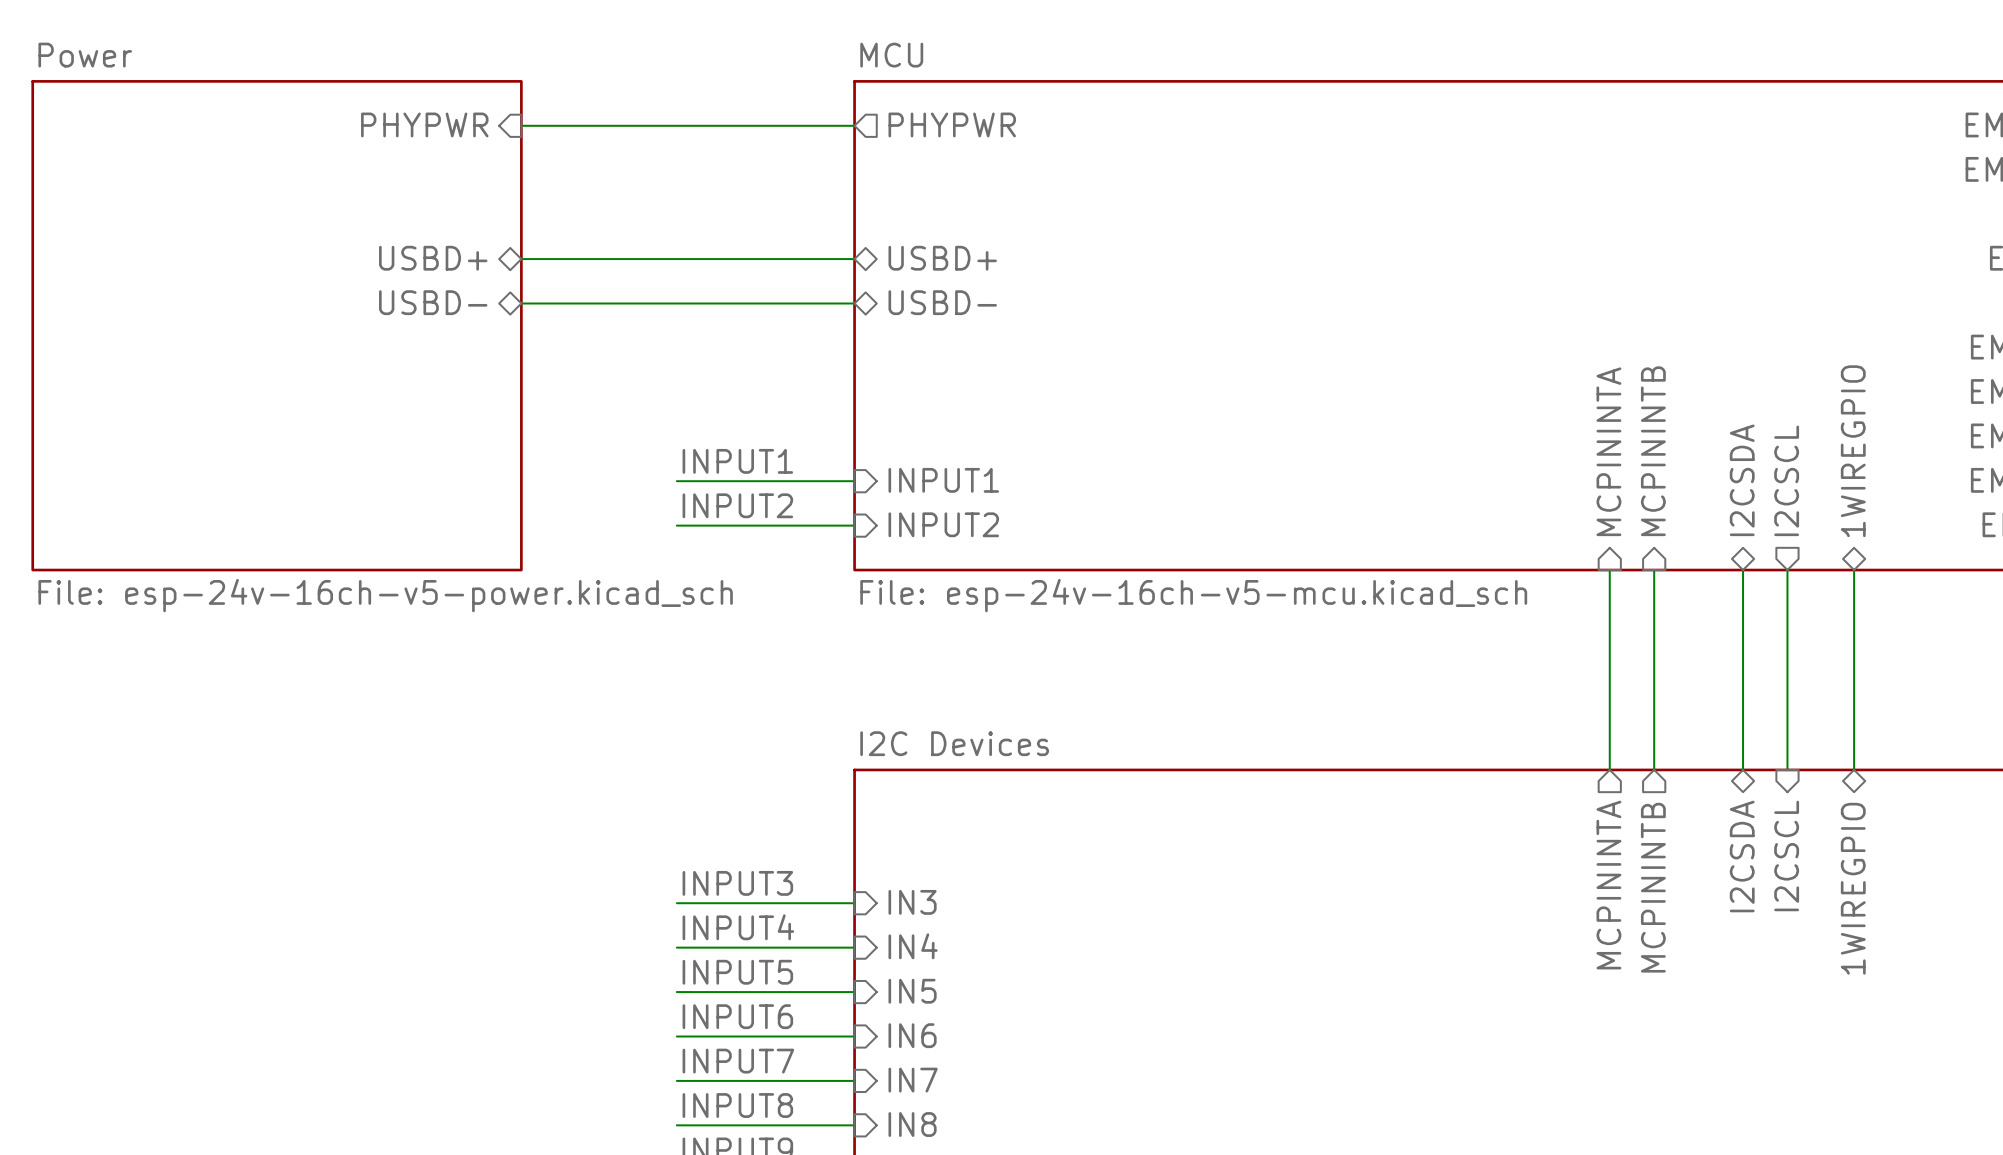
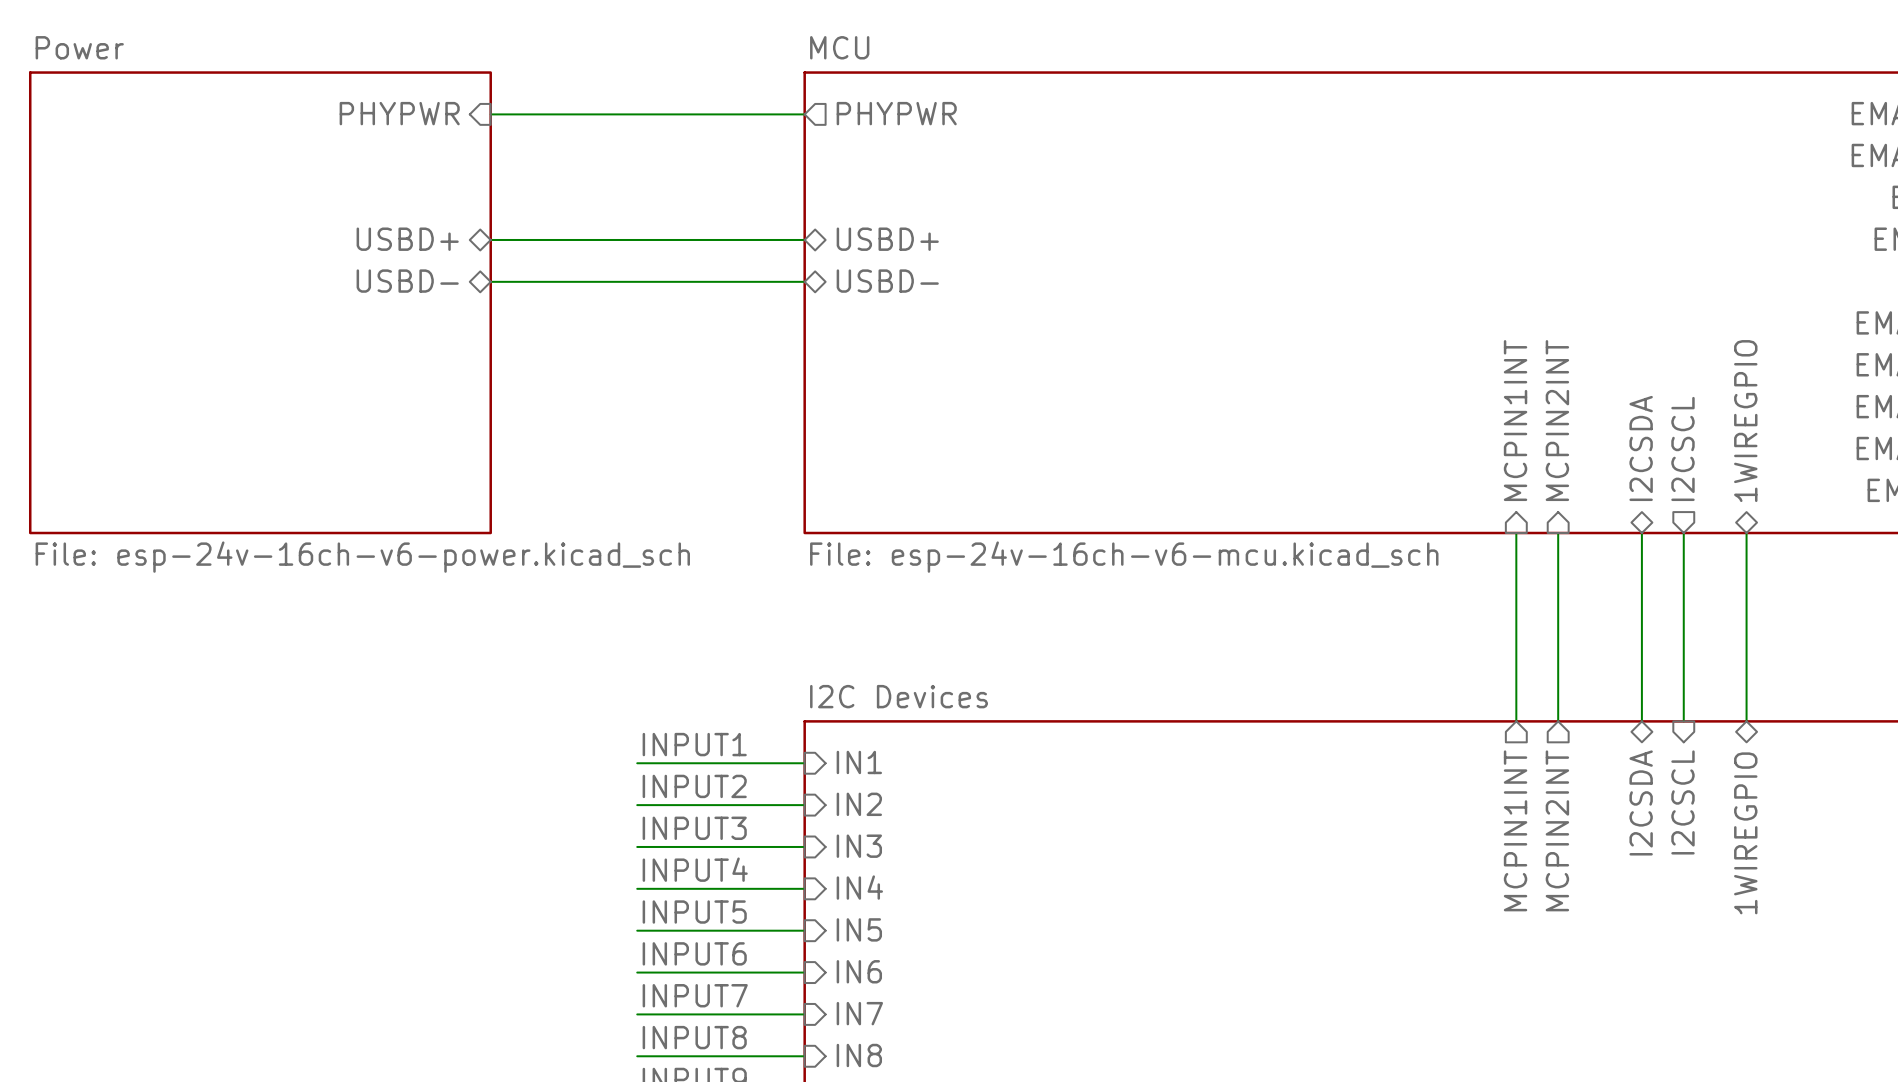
sheet pin: MCPININTA (1608, 451) -> MCPIN1INT (1515, 420)
sheet pin: MCPININTB (1653, 451) -> MCPIN2INT (1557, 420)
label position: INPUT1 (737, 461) -> INPUT1 (694, 744)
sheet pin: INPUT1 (943, 480) -> none
wire: (676, 481) (854, 481) -> (637, 763) (804, 763)
label position: INPUT2 (737, 505) -> INPUT2 (694, 786)
sheet pin: INPUT2 (943, 524) -> none
wire: (676, 525) (854, 525) -> (637, 805) (804, 805)
sheet Power value: File: esp-24v-16ch-v5-power.kicad_sch (385, 595) -> File: esp-24v-16ch-v6-power.kicad_sch (362, 557)
sheet MCU value: File: esp-24v-16ch-v5-mcu.kicad_sch (1193, 595) -> File: esp-24v-16ch-v6-mcu.kicad_sch (1124, 557)
sheet pin: none -> IN1 (859, 762)
sheet pin: none -> IN2 (859, 804)
sheet pin: MCPININTA (1608, 885) -> MCPIN1INT (1515, 830)
sheet pin: MCPININTB (1653, 887) -> MCPIN2INT (1557, 830)

